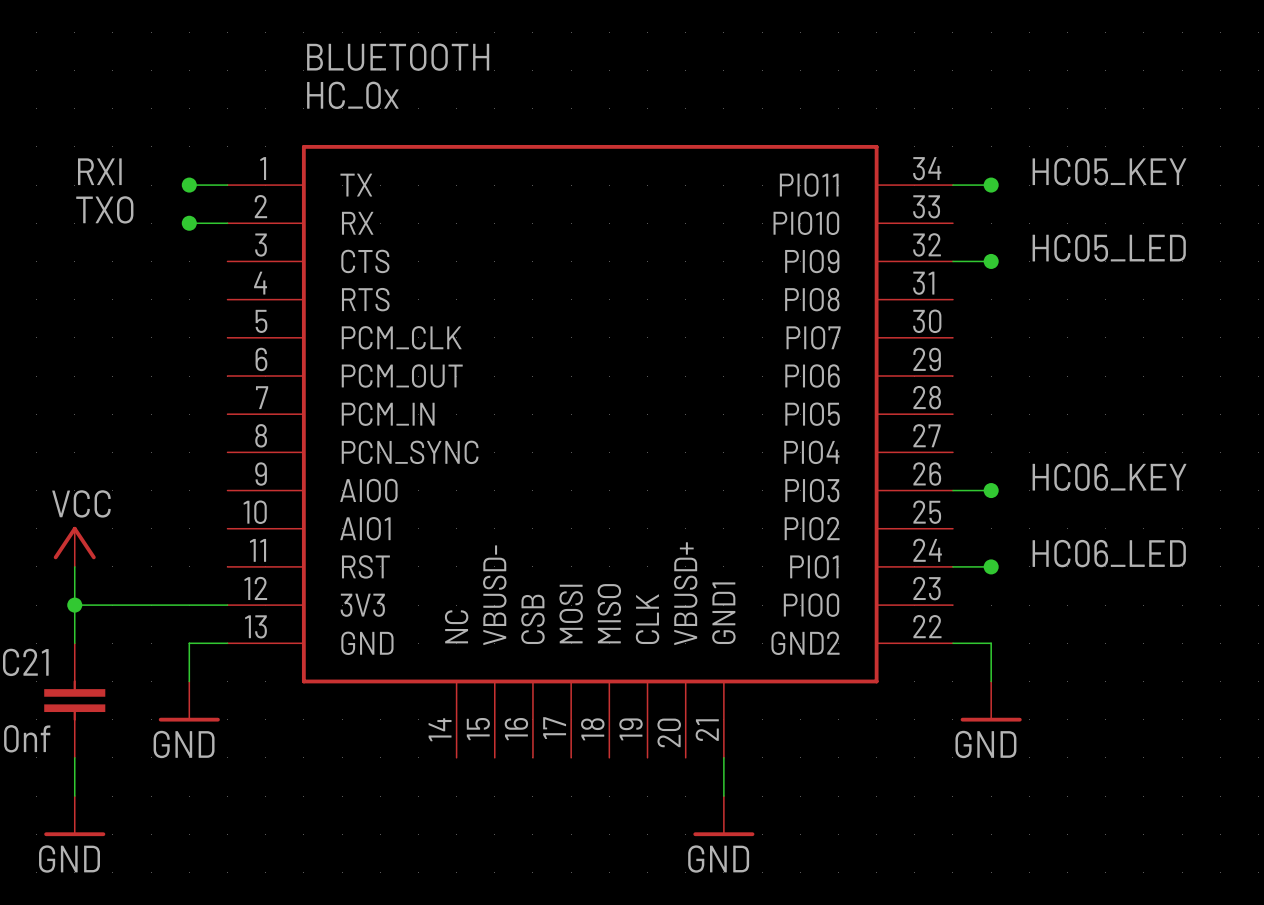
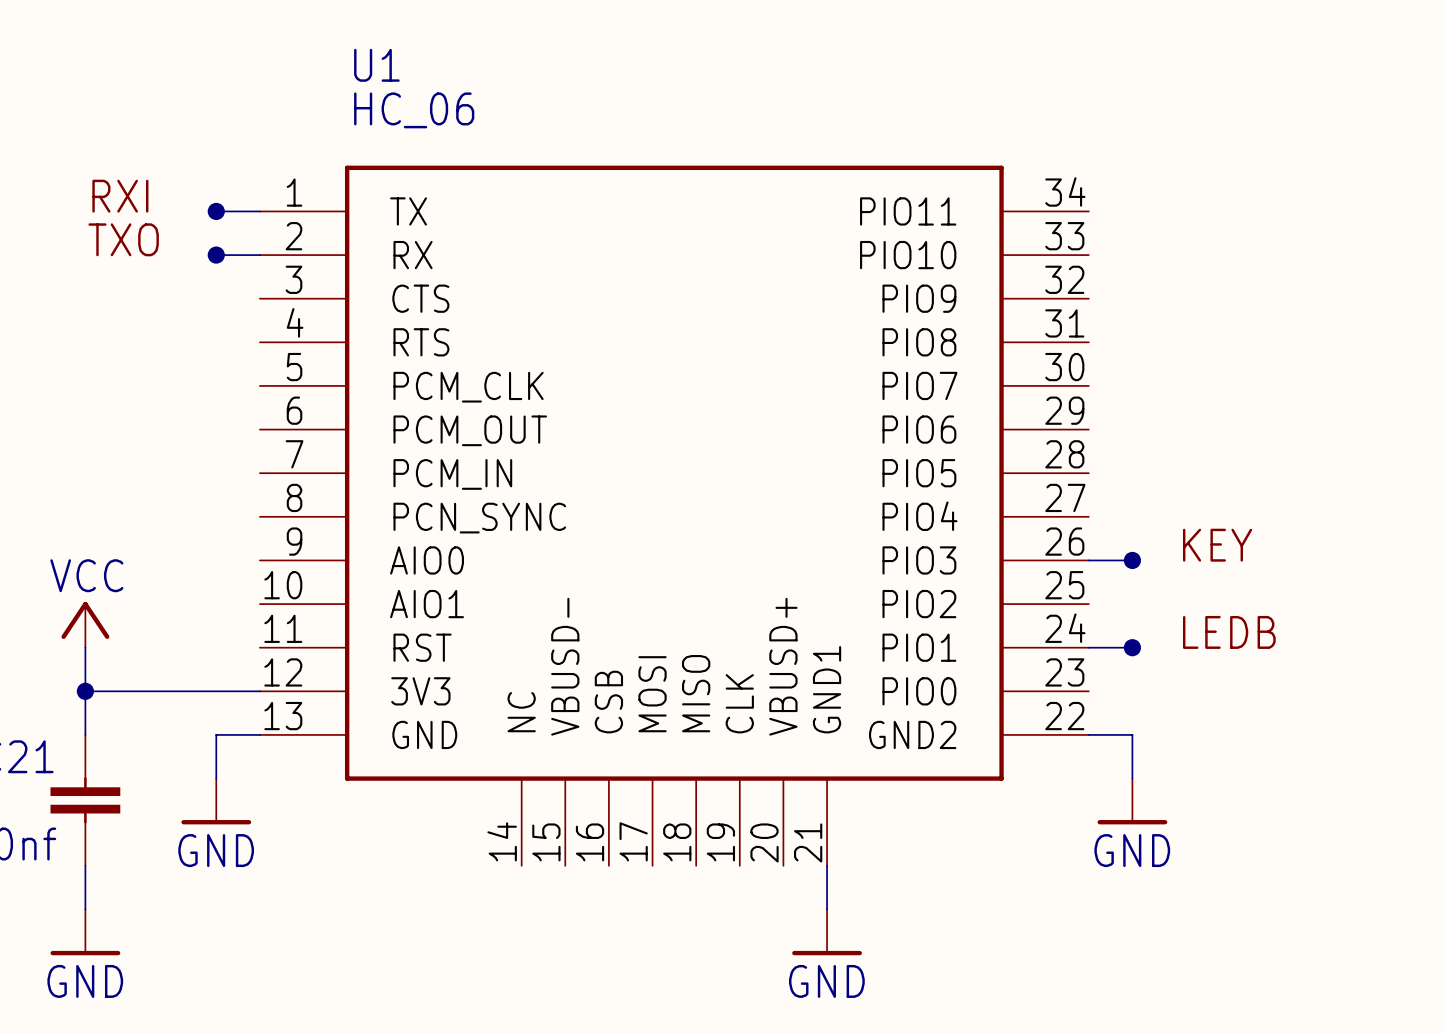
BLUETOOTH name: BLUETOOTH (398, 57) -> U1 (376, 65)
BLUETOOTH value: HC_0x (352, 95) -> HC_06 (414, 110)
label: HC05_KEY (1109, 171) -> none
wire: (952, 185) (991, 185) -> none
junction: (991, 185) -> none
label: HC05_LED (1109, 248) -> none
wire: (952, 261) (991, 261) -> none
junction: (991, 261) -> none
label: HC06_KEY (1109, 477) -> KEY (1217, 545)
label: HC06_LED (1109, 553) -> LEDB (1229, 632)

